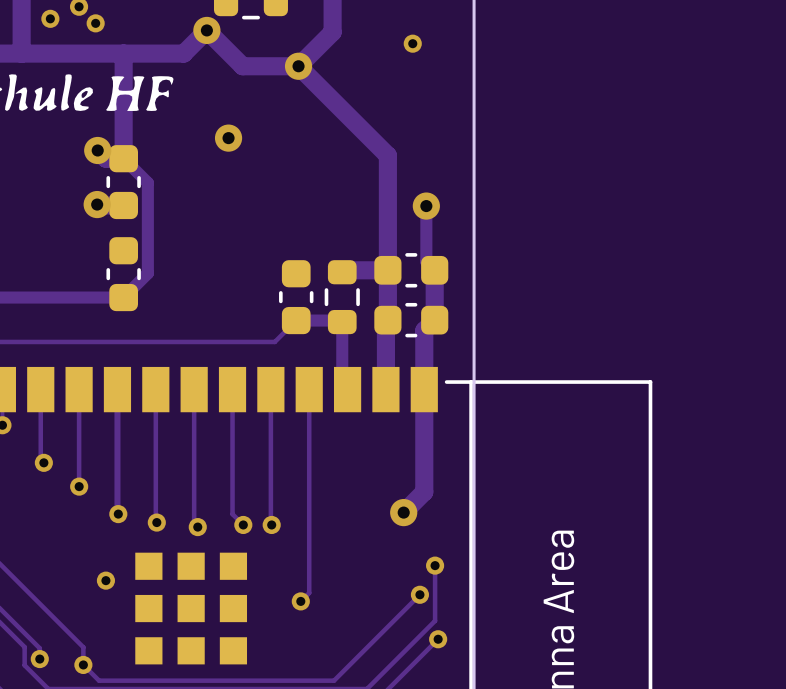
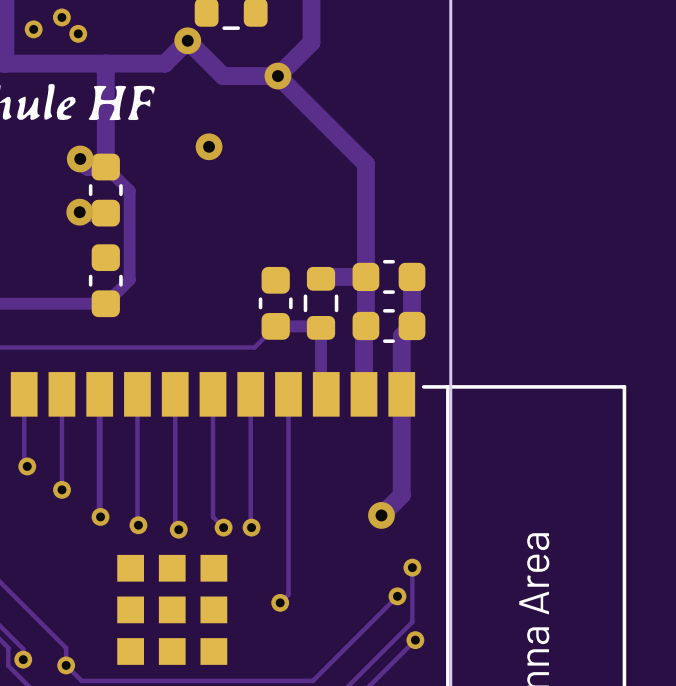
via: (412, 43) -> none
track: (426, 206) (426, 261) (434, 270) -> none
via: (426, 206) -> none
via: (105, 580) -> none

